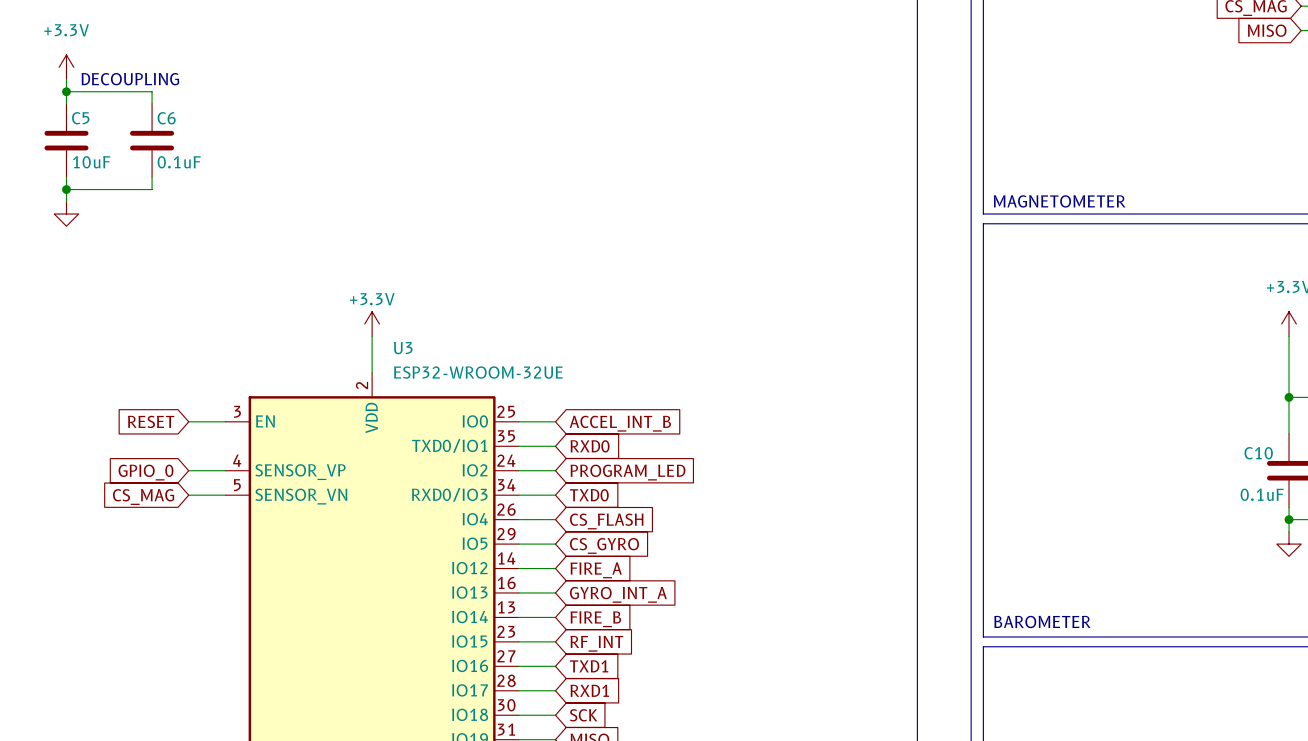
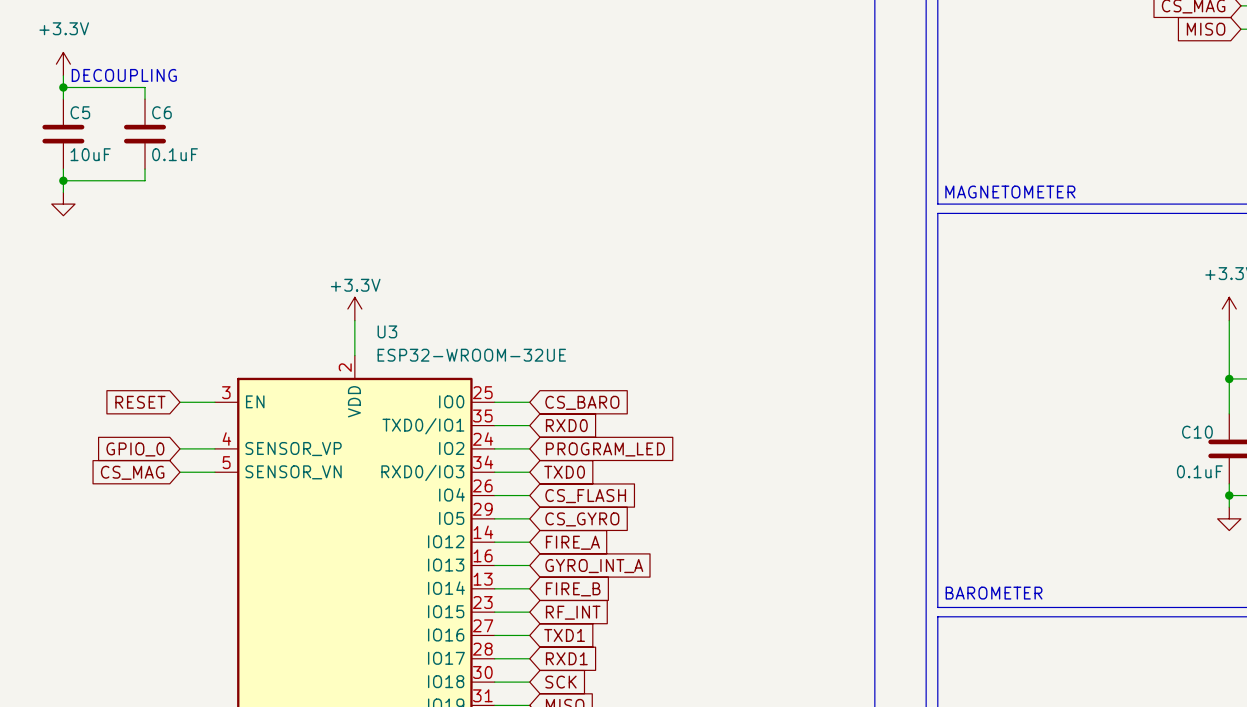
global label: ACCEL_INT_B (620, 423) -> CS_BARO (582, 402)

